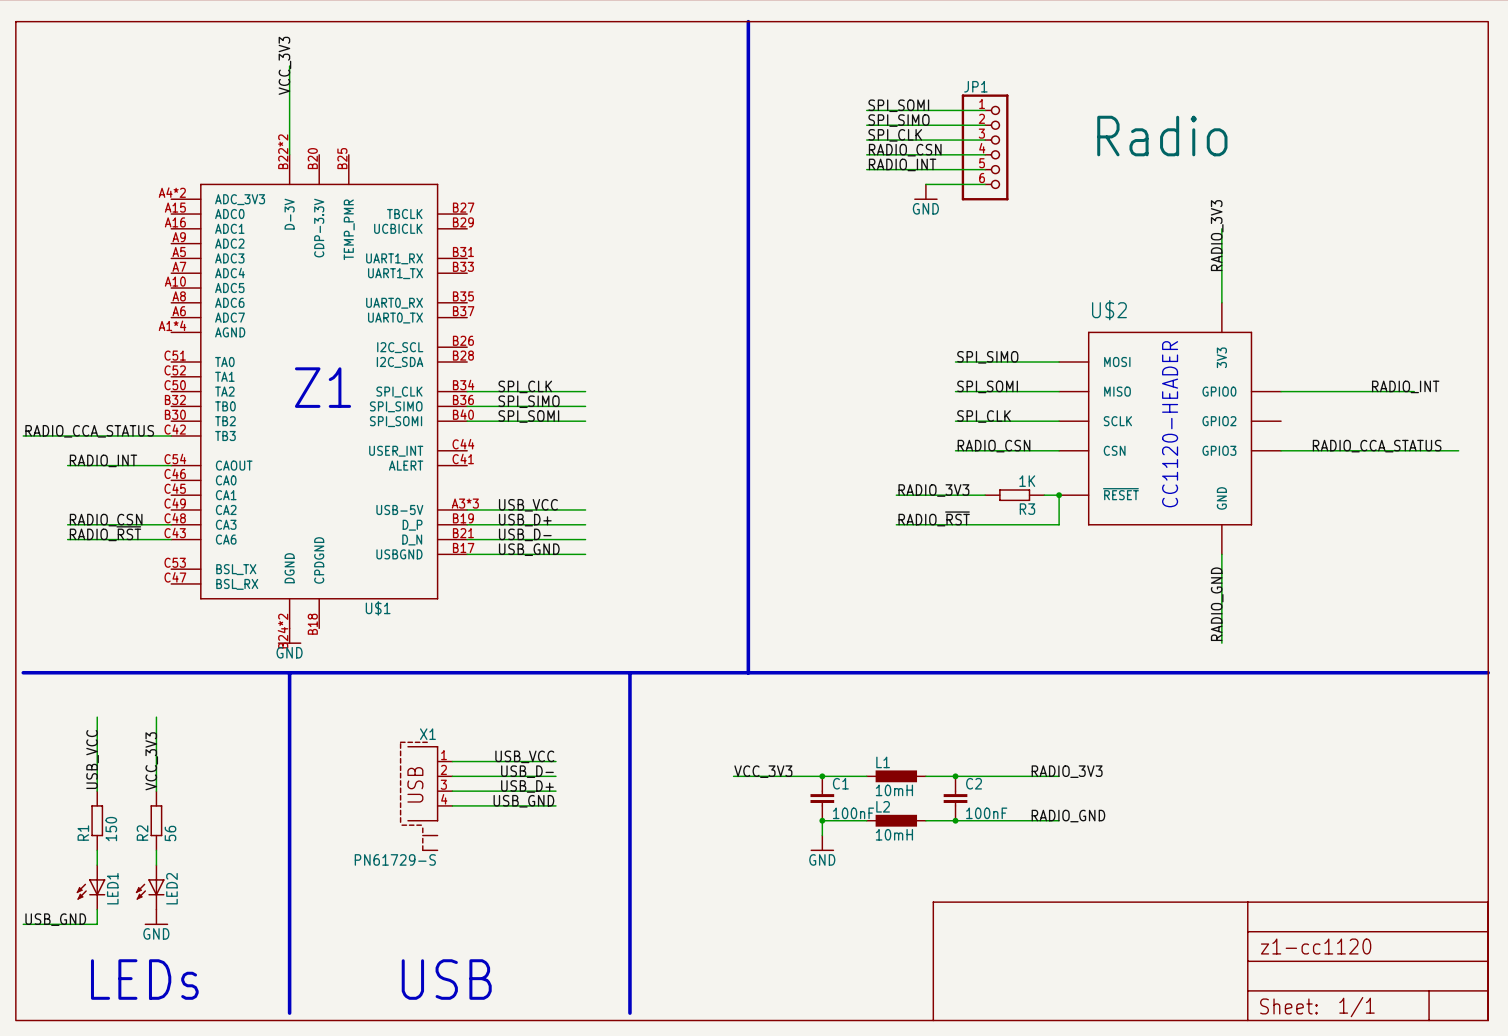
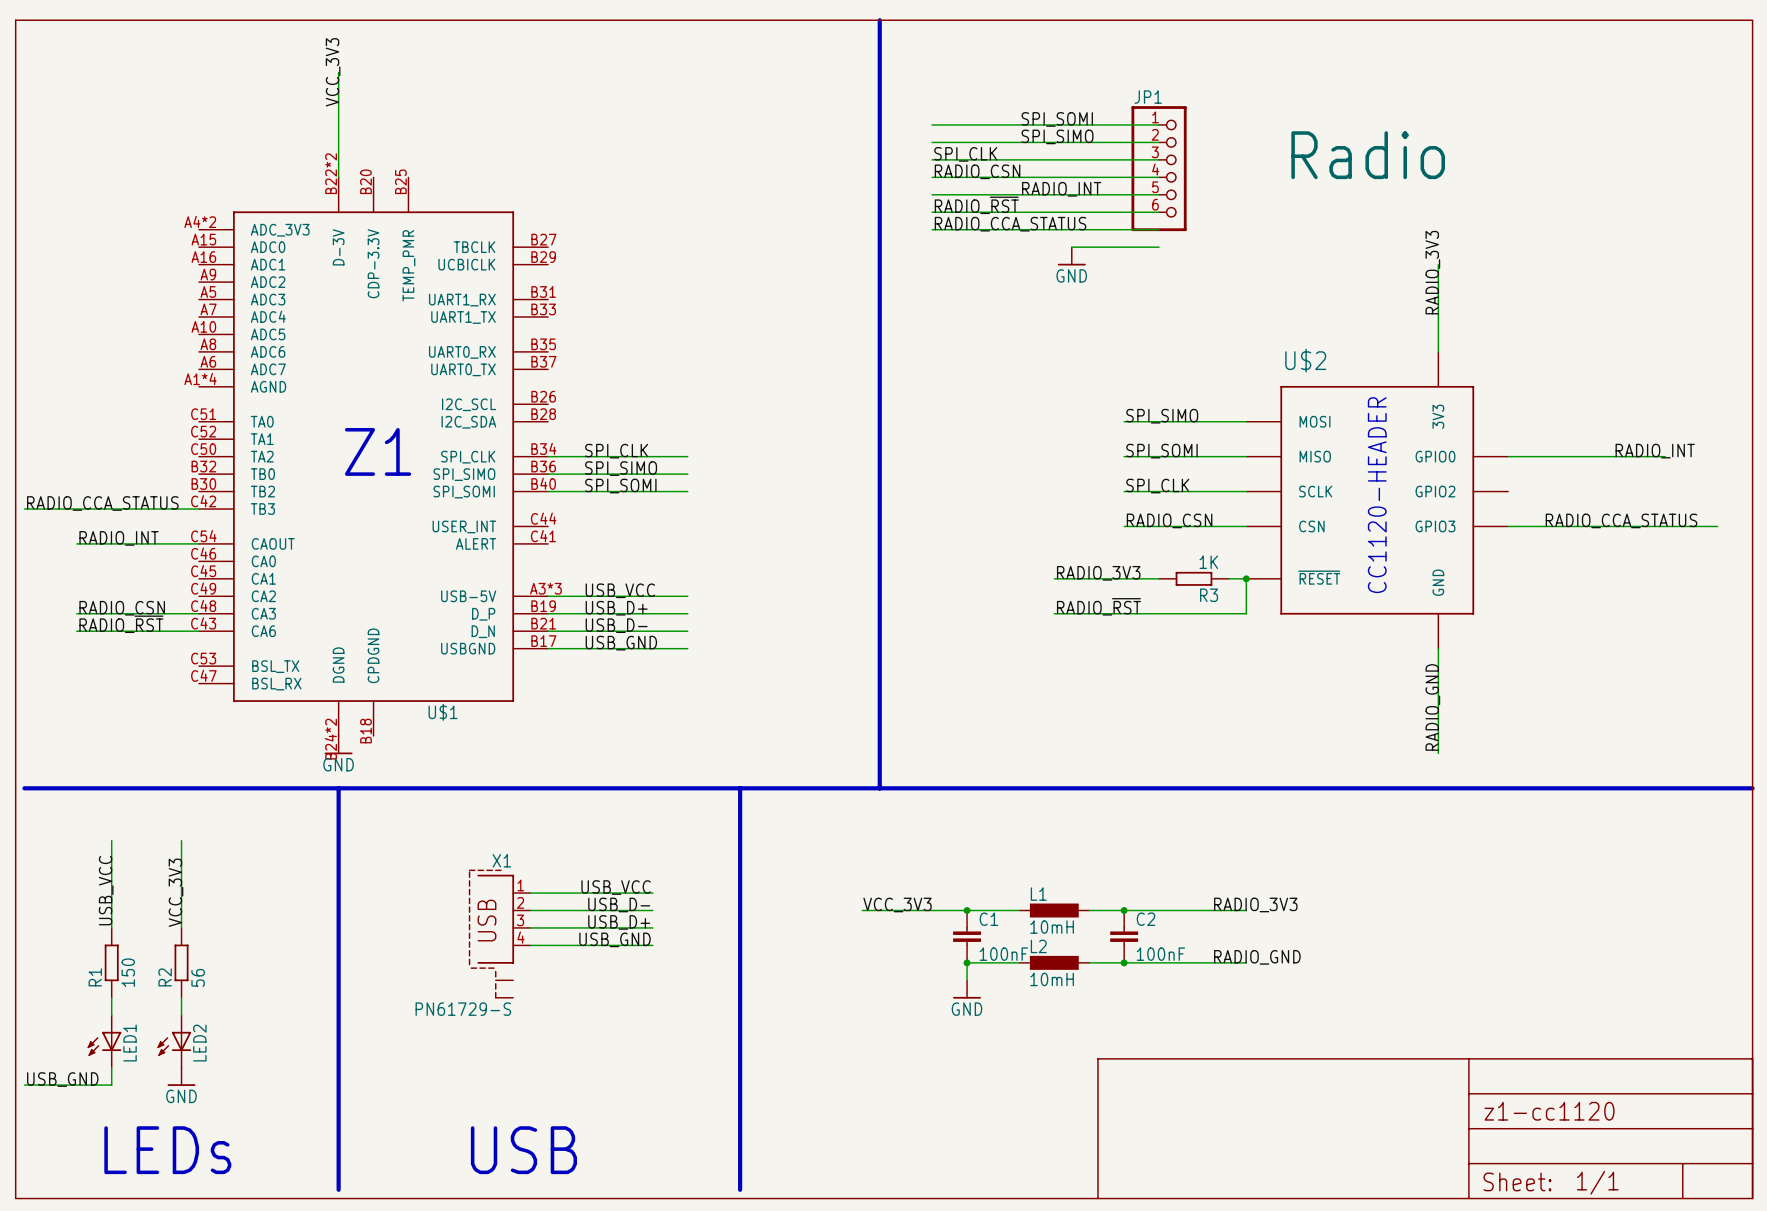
wire: none -> (932, 124) (1019, 124)
wire: none -> (932, 142) (1019, 142)
label position: SPI_CLK (895, 135) -> SPI_CLK (965, 154)
wire: none -> (932, 159) (1019, 159)
label position: RADIO_CSN (905, 150) -> RADIO_CSN (977, 171)
wire: none -> (932, 177) (1019, 177)
wire: none -> (932, 194) (1019, 194)
label: none -> RADIO_~{RST} (976, 205)
wire: none -> (932, 212) (1089, 212)
power symbol position: GND (925, 192) -> GND (1071, 256)
label: none -> RADIO_CCA_STATUS (1010, 224)
wire: none -> (932, 229) (1159, 229)
wire: none -> (1071, 247) (1159, 247)

